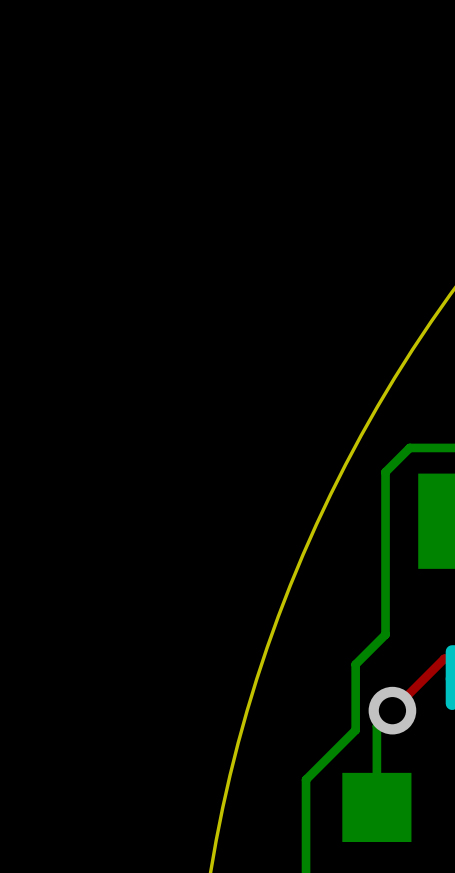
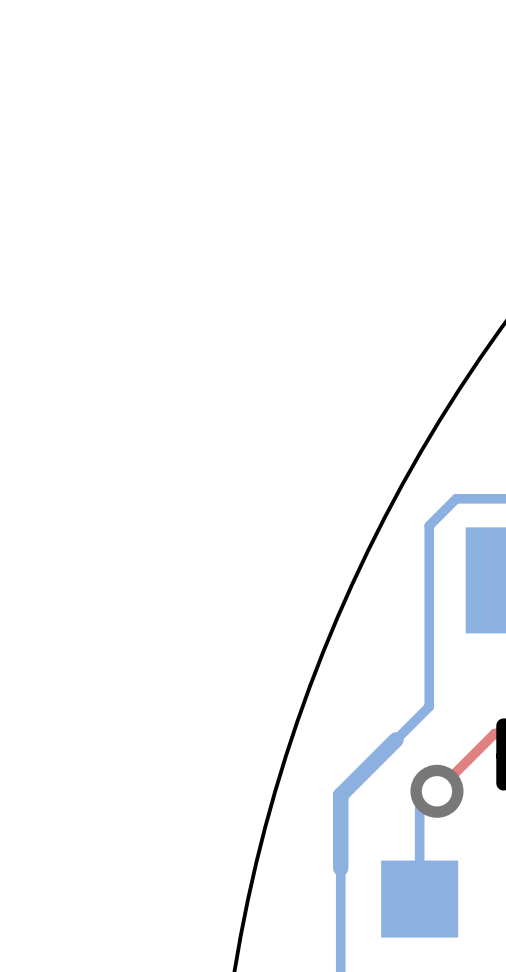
bottom track: (355, 664) (355, 730) (306, 779) -> (396, 739) (340, 795) (340, 868)

